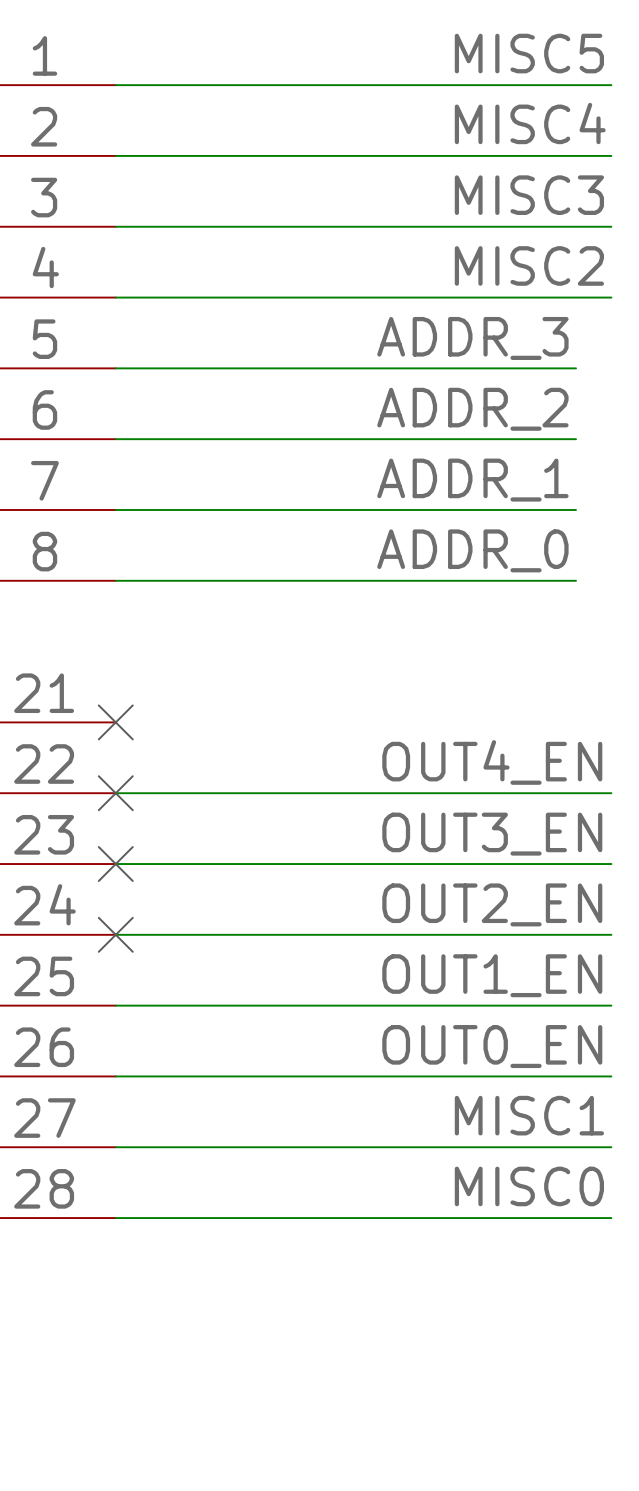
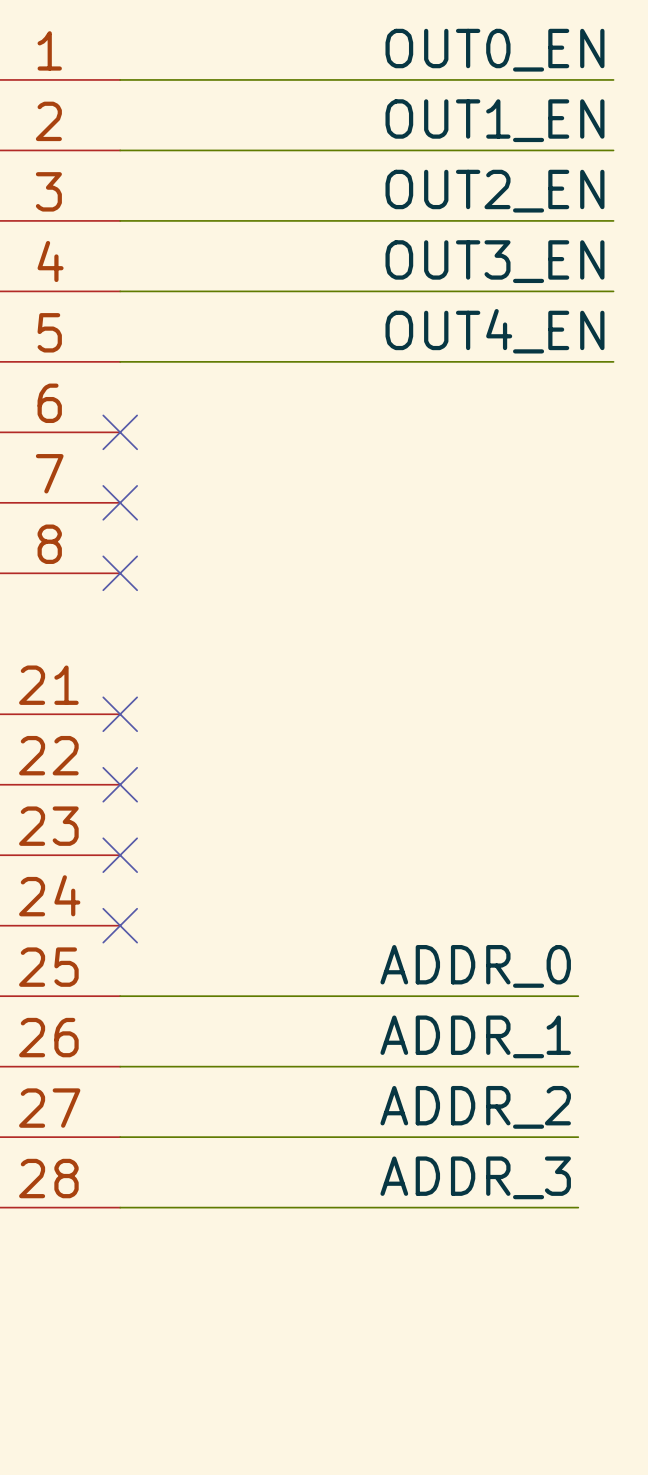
label: MISC5 (529, 53) -> OUT0_EN (494, 50)
label: MISC4 (530, 123) -> OUT1_EN (494, 120)
label: MISC3 (529, 195) -> OUT2_EN (494, 191)
label: MISC2 (529, 265) -> OUT3_EN (494, 261)
label: ADDR_3 (472, 338) -> none
label: ADDR_2 (472, 409) -> none
wire: (115, 439) (576, 439) -> none
no-connect mark: none -> (120, 432)
label position: ADDR_1 (472, 480) -> ADDR_1 (475, 1036)
wire: (115, 509) (576, 509) -> none
no-connect mark: none -> (120, 502)
label position: ADDR_0 (472, 550) -> ADDR_0 (475, 966)
wire: (115, 580) (576, 580) -> none
no-connect mark: none -> (120, 573)
label position: OUT4_EN (492, 762) -> OUT4_EN (494, 331)
wire: (115, 793) (611, 793) -> none
label: OUT3_EN (492, 834) -> none
wire: (115, 864) (611, 864) -> none
label: OUT2_EN (492, 904) -> none
wire: (115, 934) (611, 934) -> none
label: OUT1_EN (492, 975) -> none
wire: (576, 1005) (611, 1005) -> (578, 361) (613, 361)
label: OUT0_EN (492, 1046) -> none
wire: (576, 1076) (611, 1076) -> none
label: MISC1 (529, 1115) -> none
label: none -> ADDR_2 (475, 1107)
wire: (576, 1147) (611, 1147) -> none
label: MISC0 (529, 1186) -> none
label: none -> ADDR_3 (475, 1177)
wire: (576, 1218) (611, 1218) -> none

